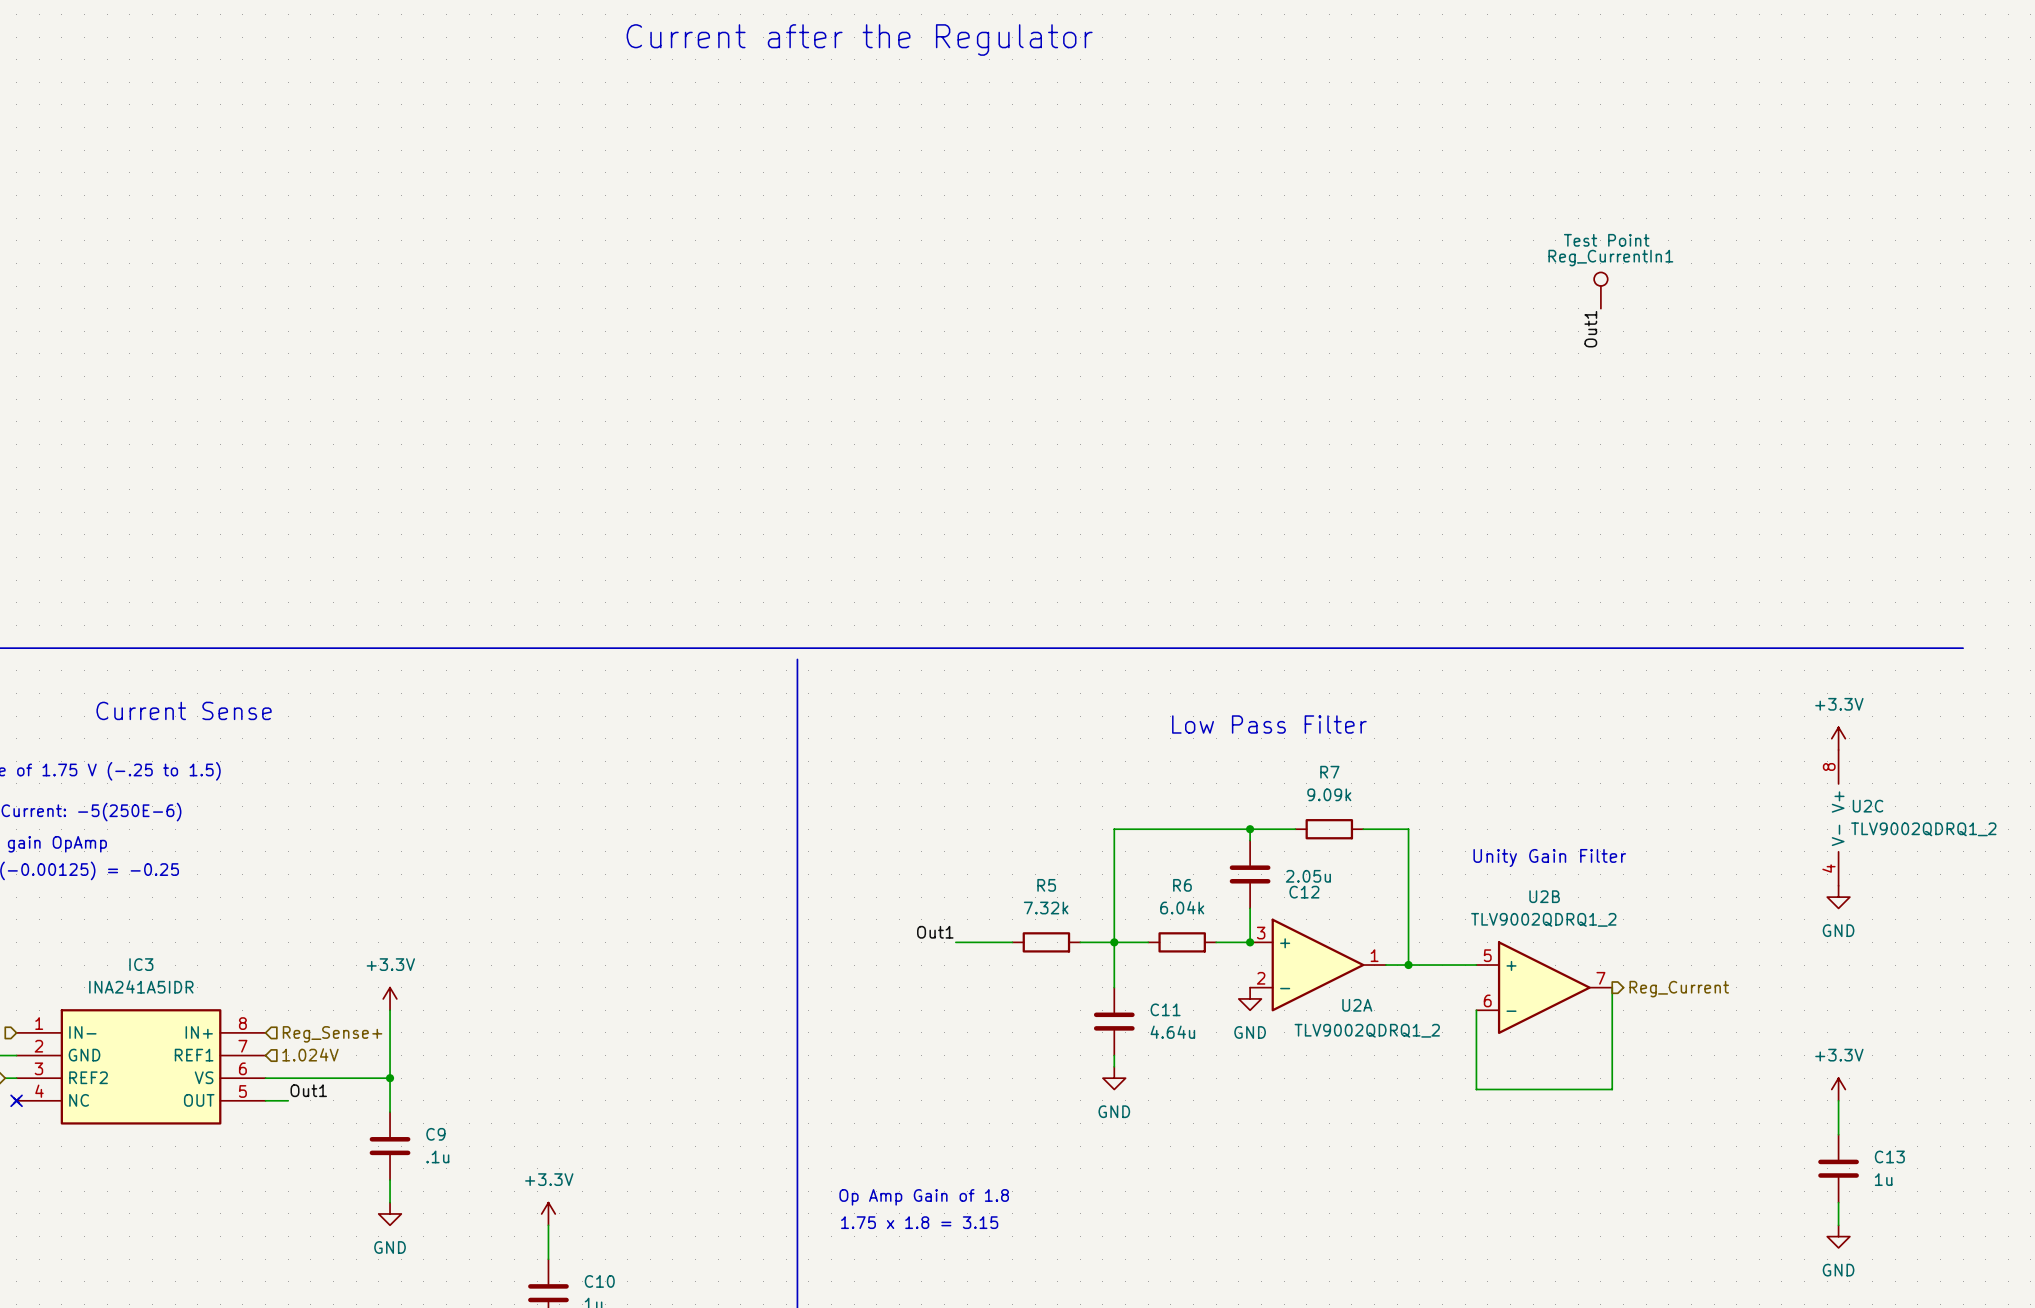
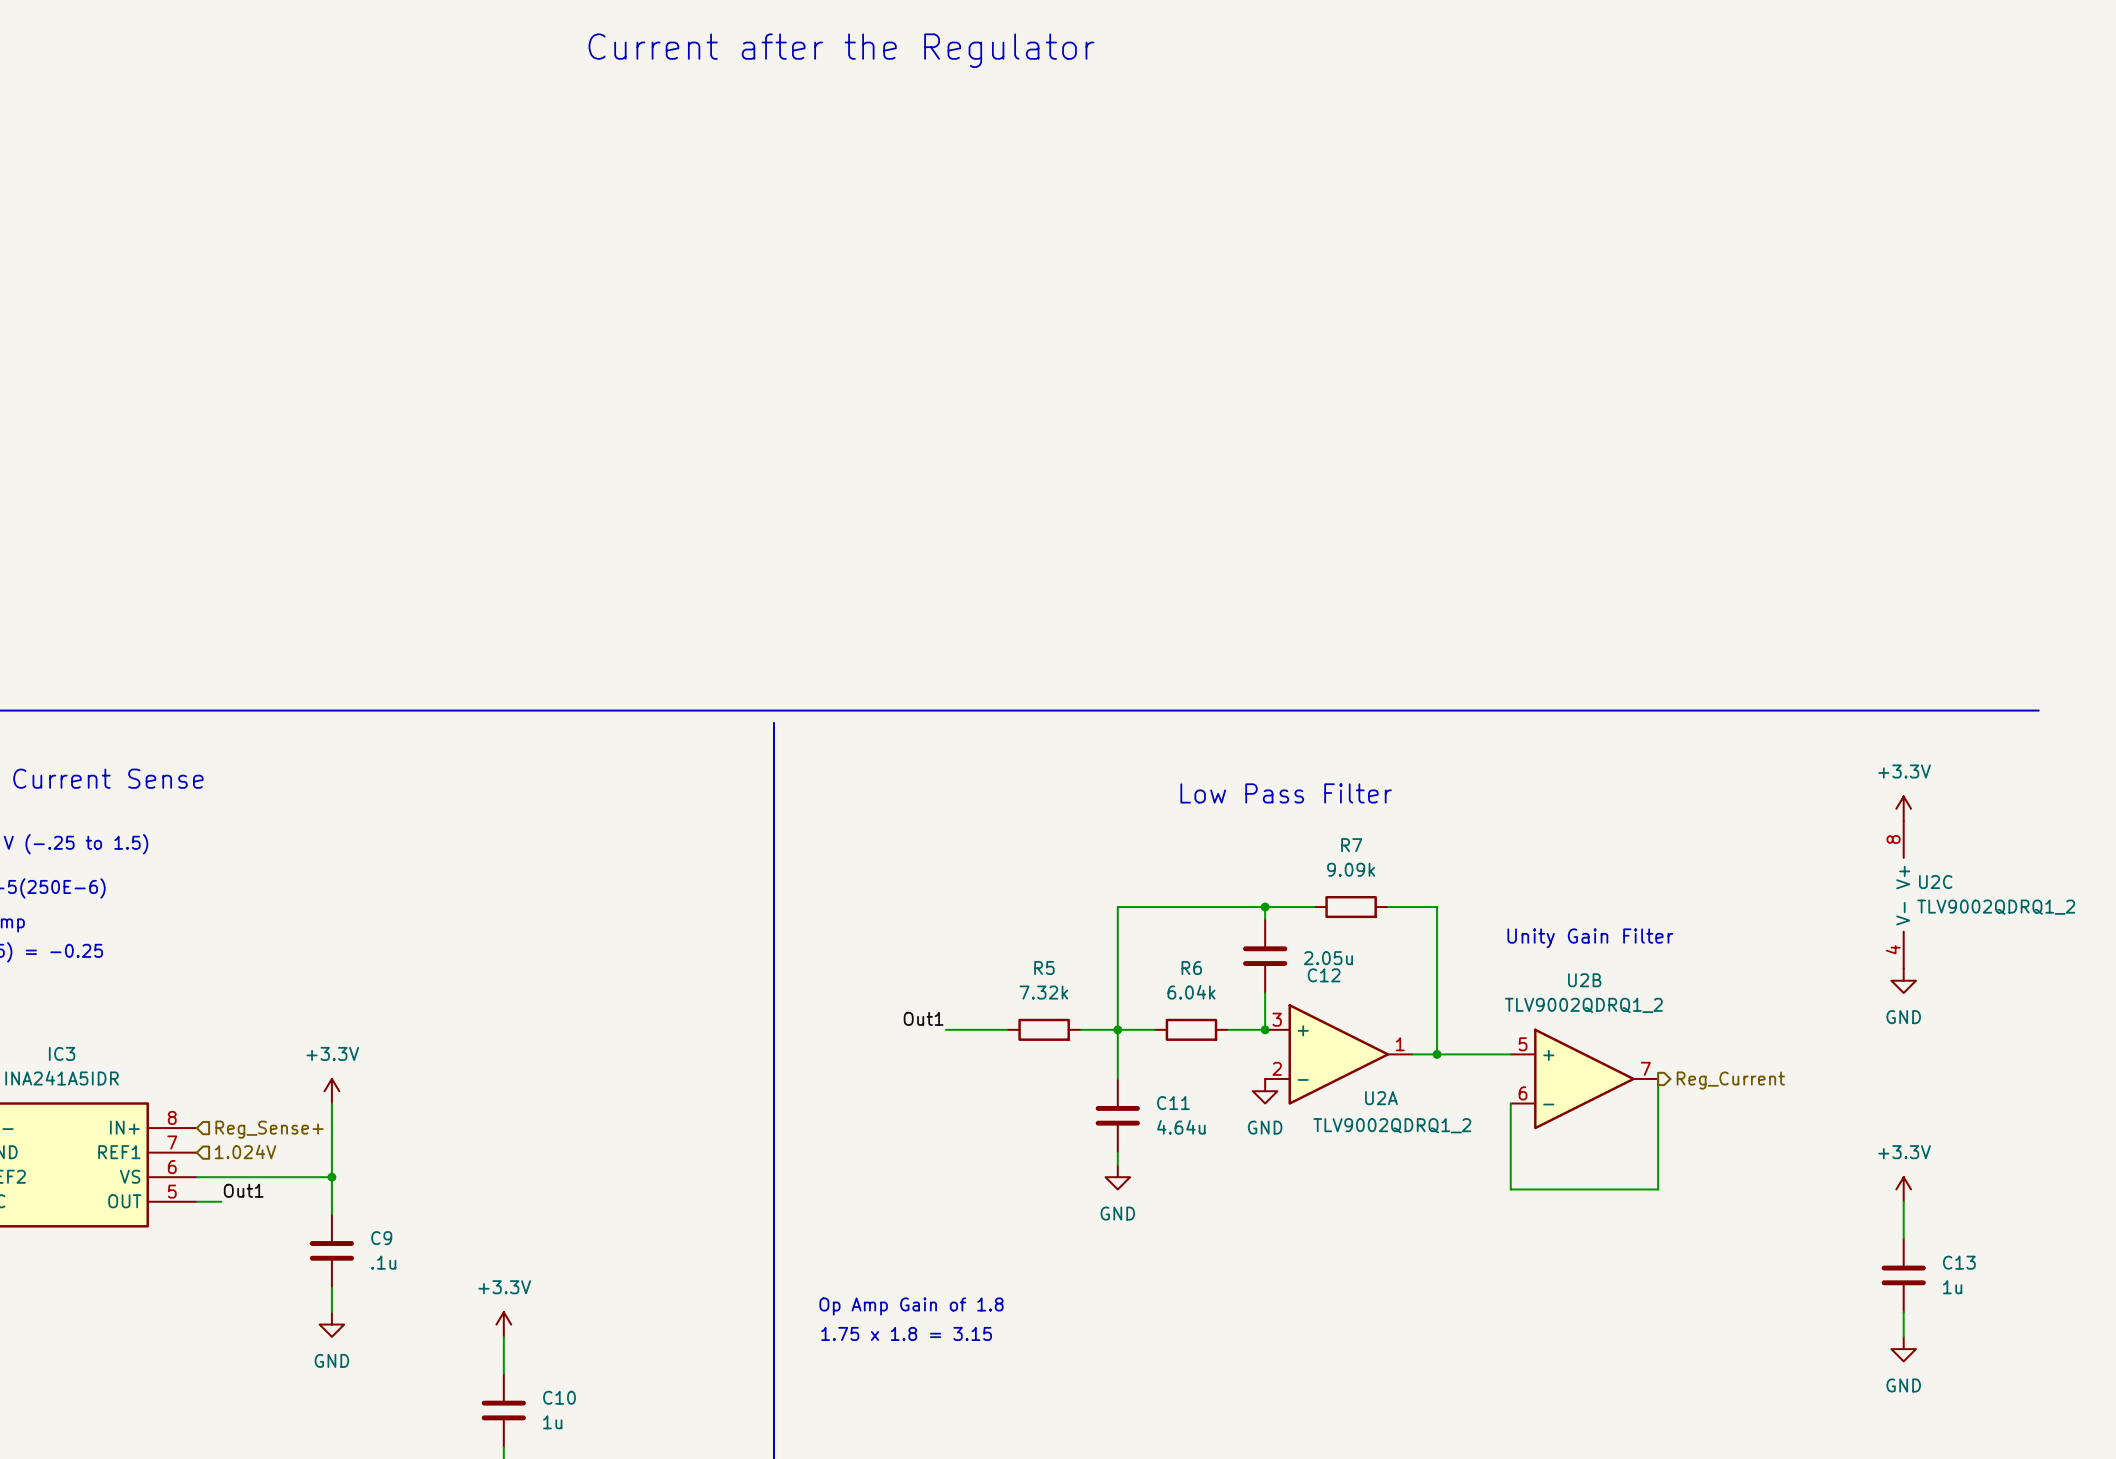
Reg_CurrentIn1: Test Point (1600, 290) -> none
label: Out1 (1590, 329) -> none

